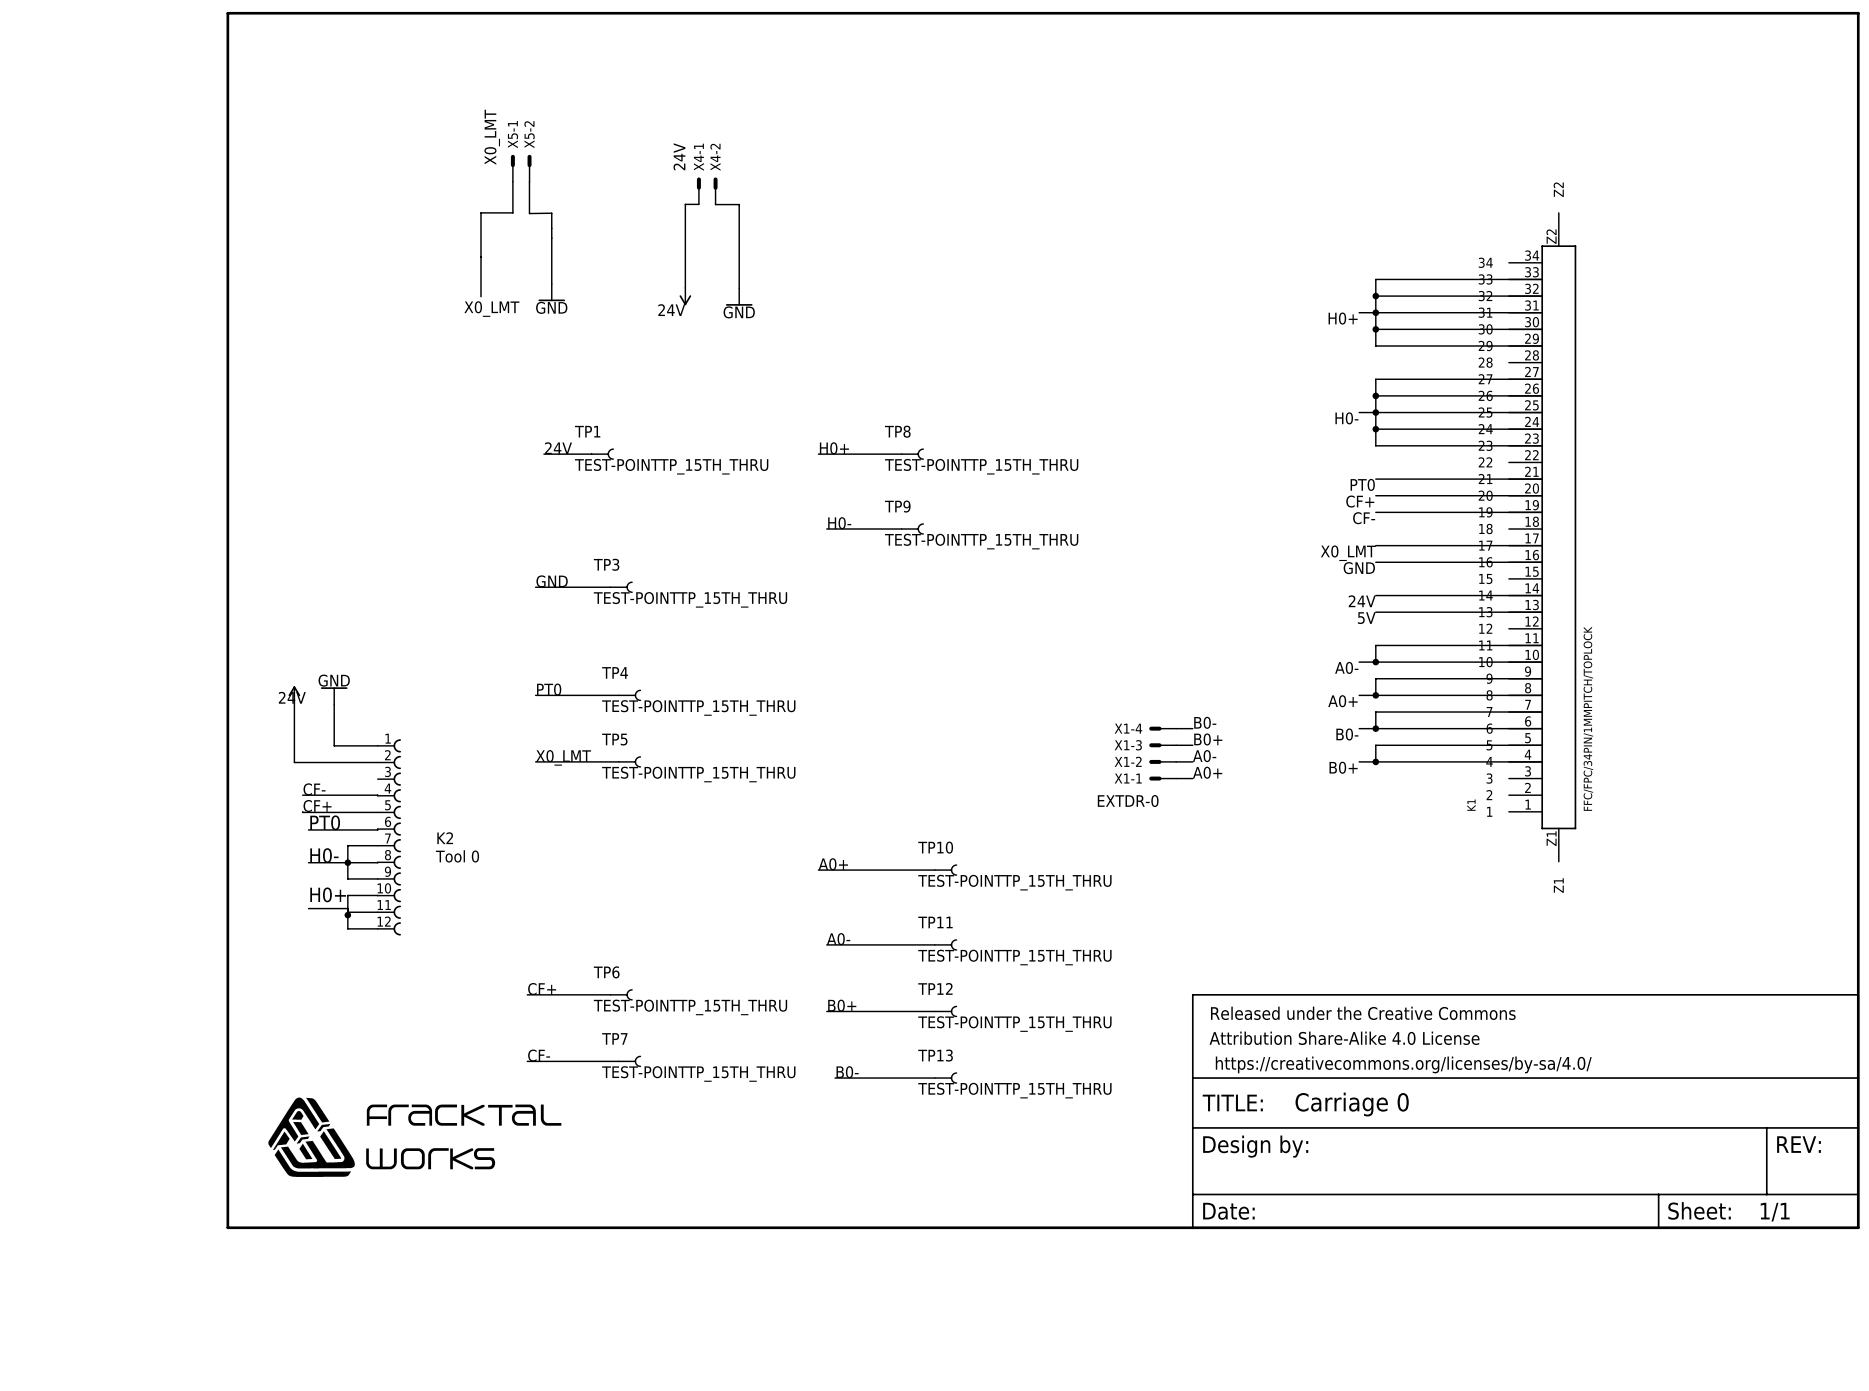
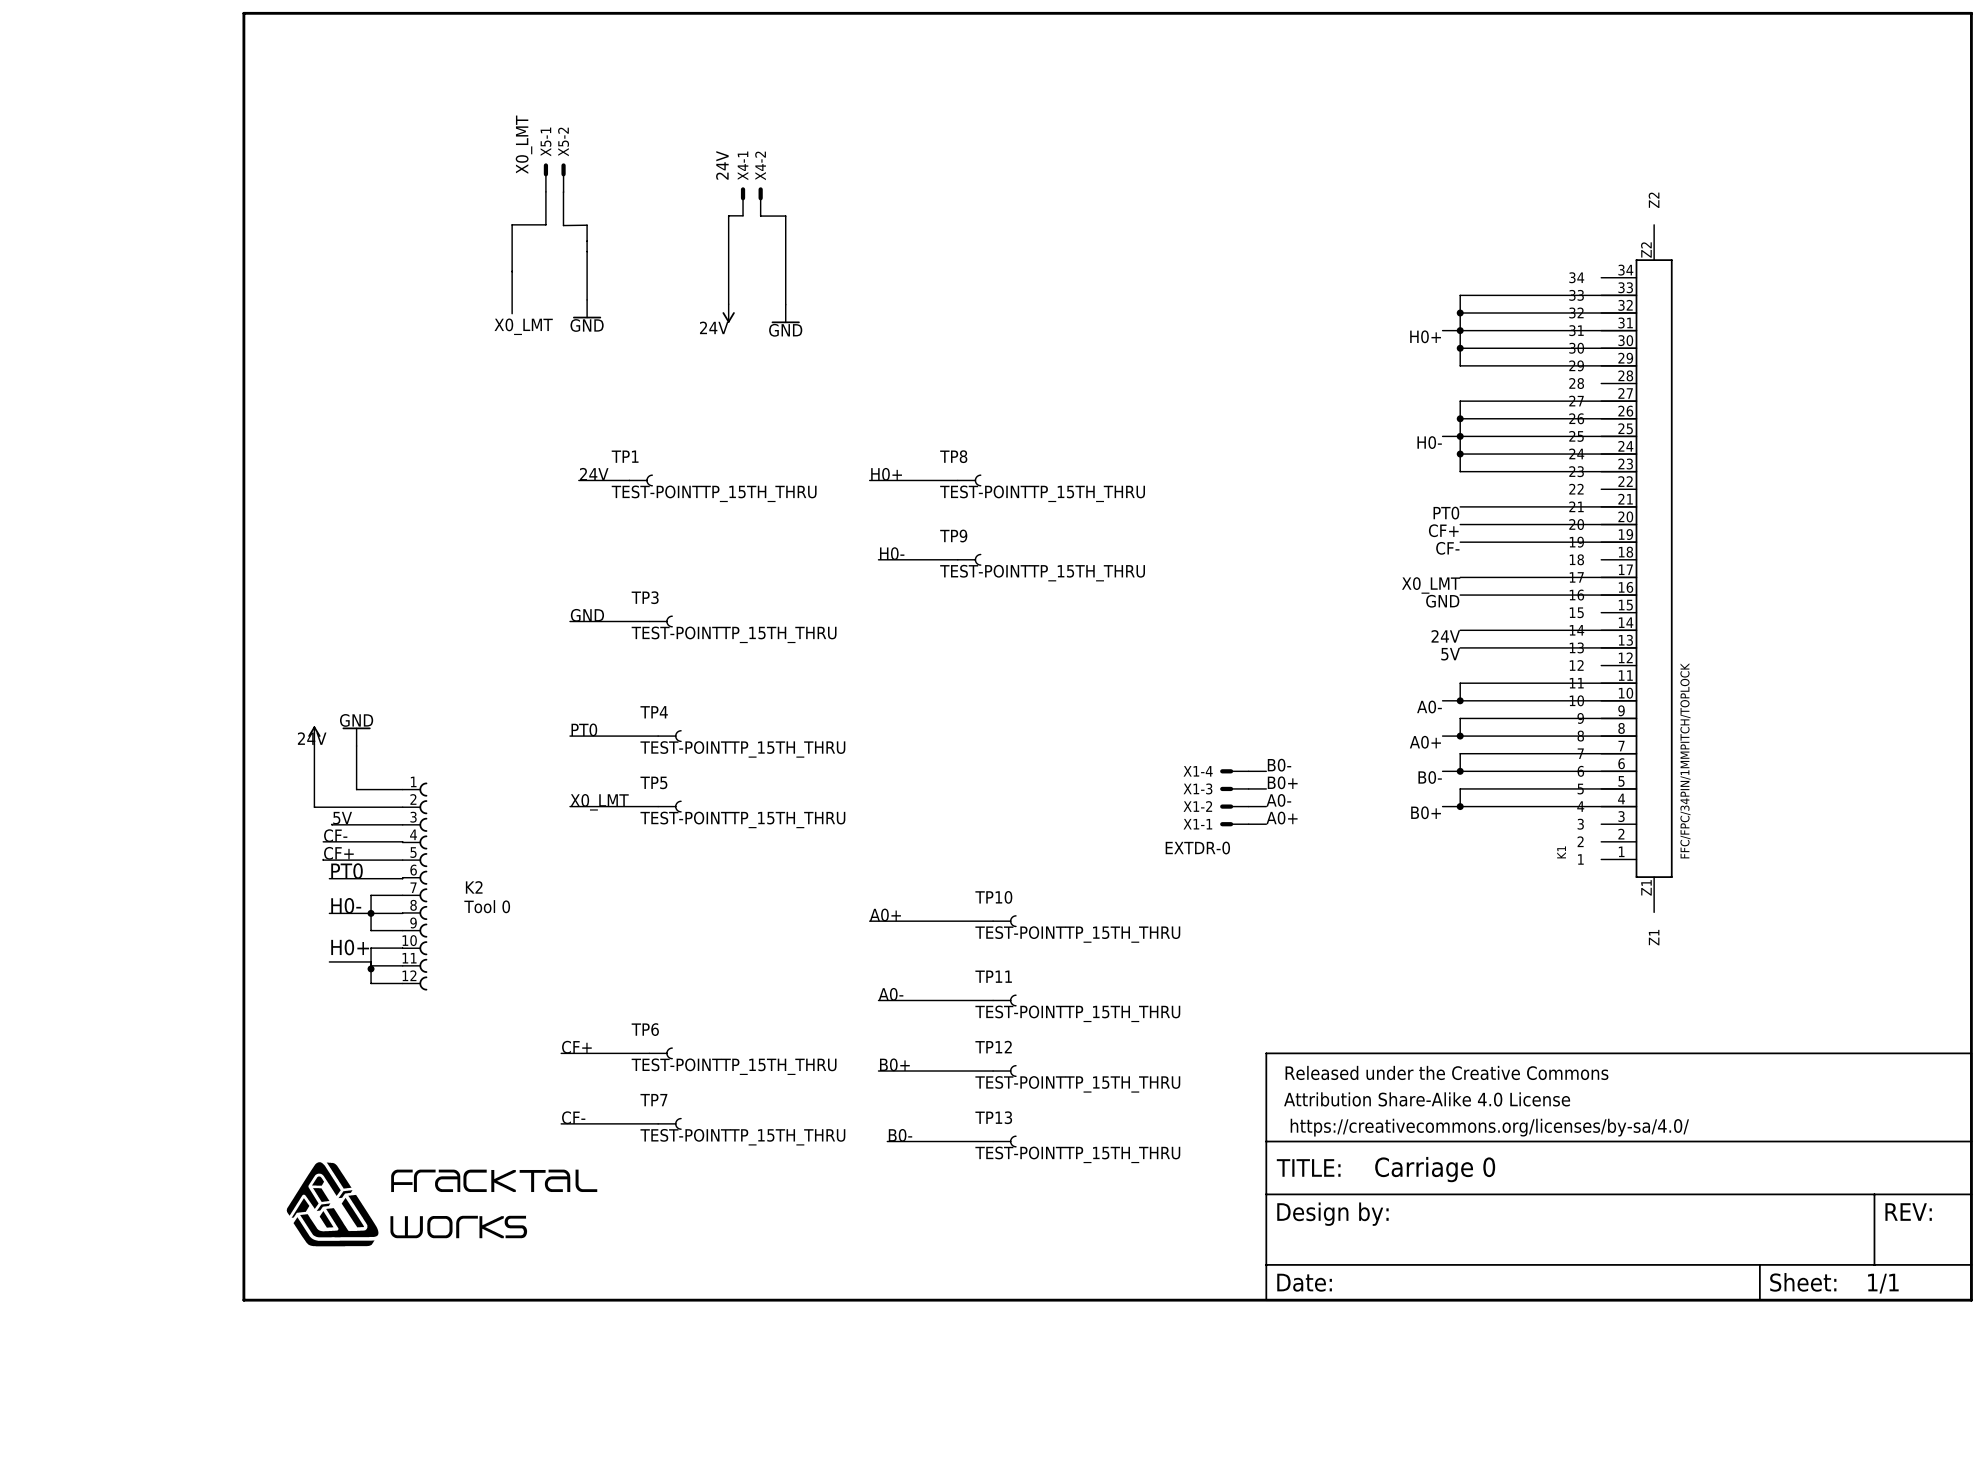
label: none -> 5V (342, 818)
wire: none -> (332, 824) (402, 824)

